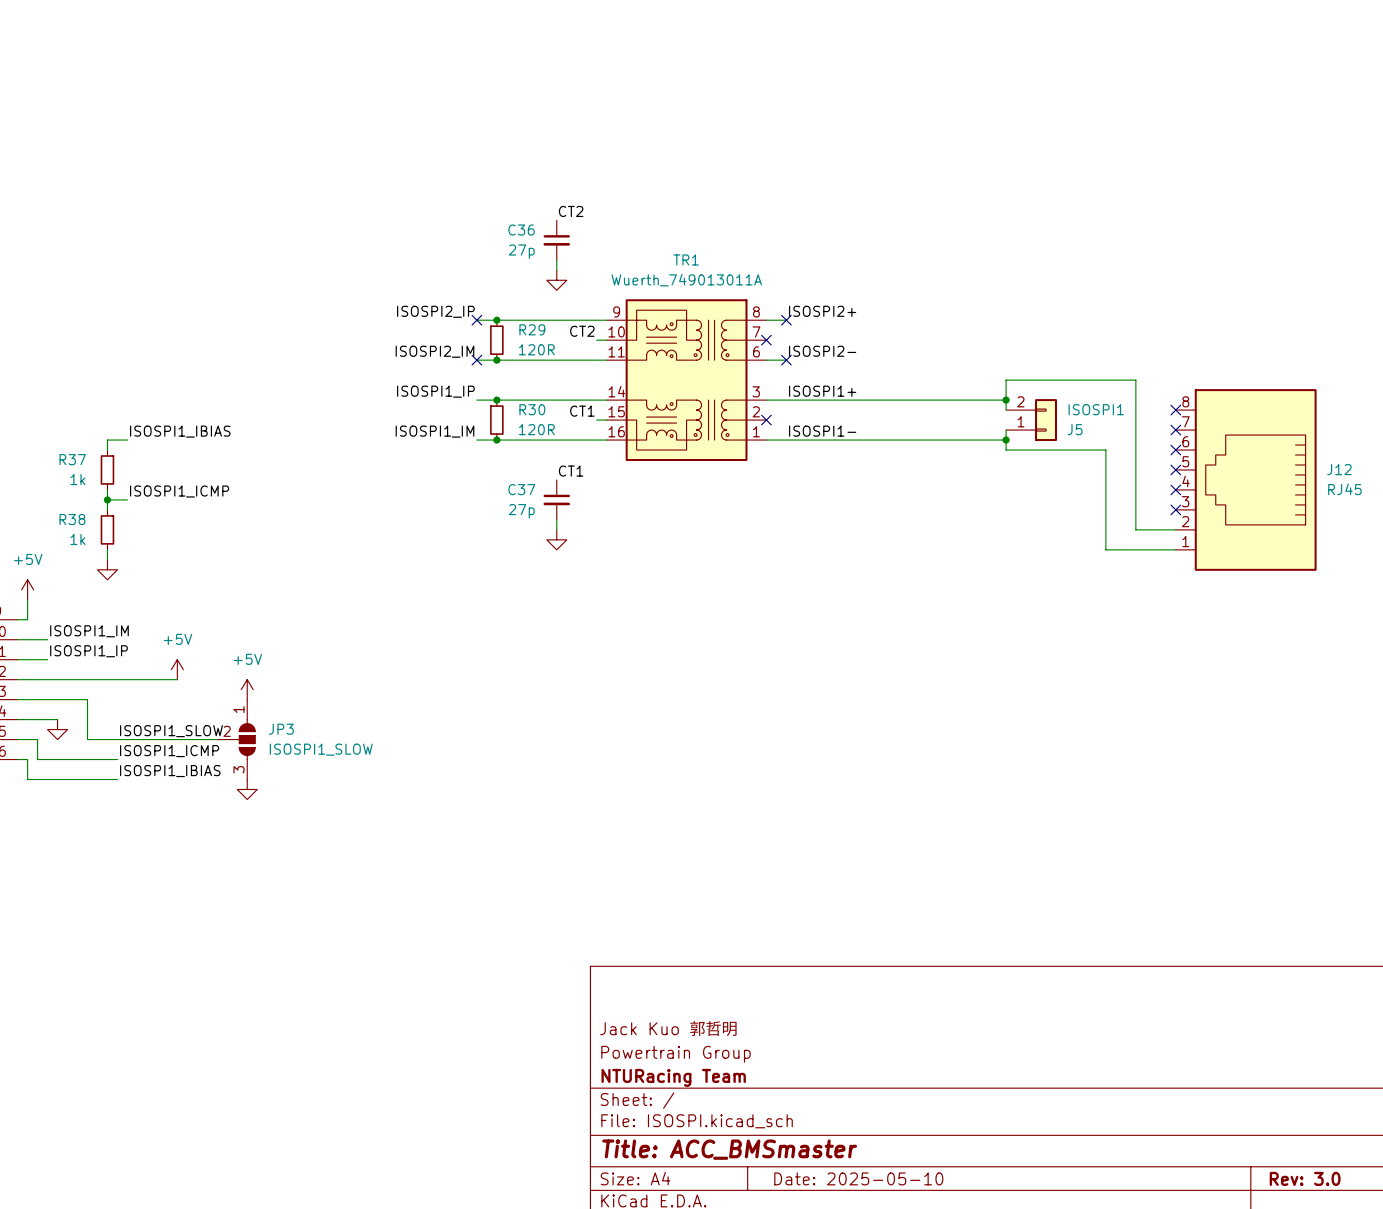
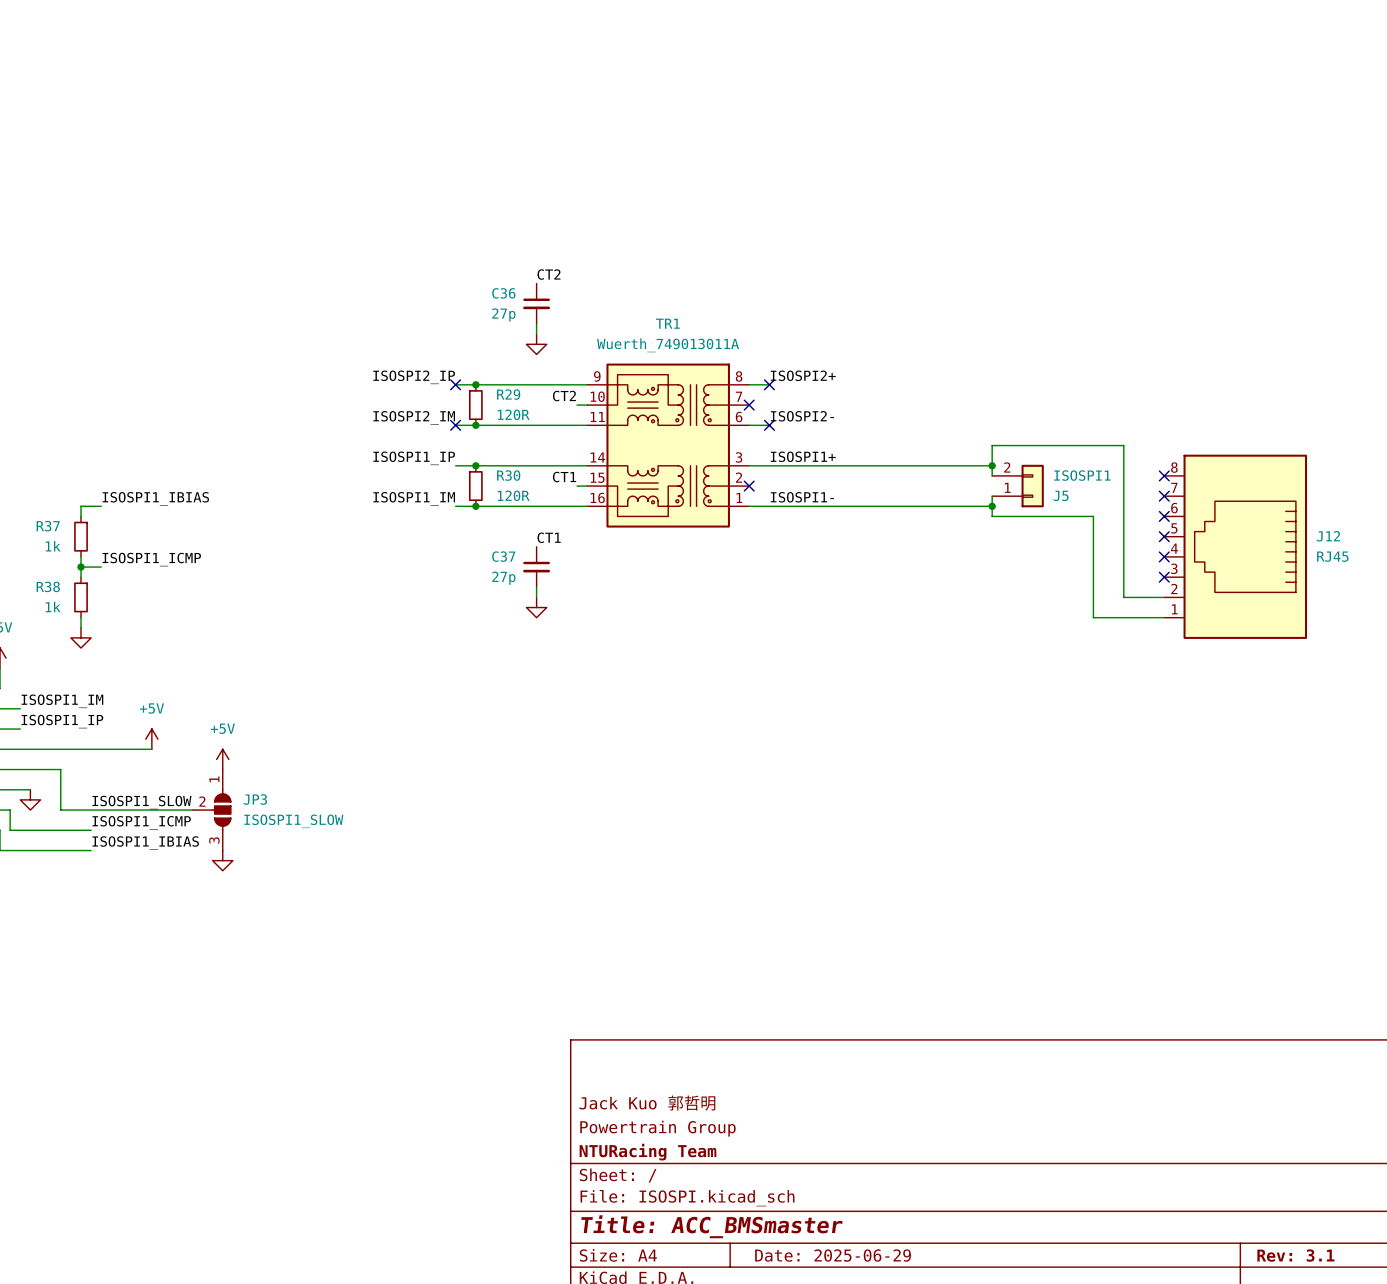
title block: Date: 2025-05-10 (858, 1178) -> Date: 2025-06-29 (833, 1255)
title block: Rev: 3.0 (1305, 1178) -> Rev: 3.1 (1295, 1255)

